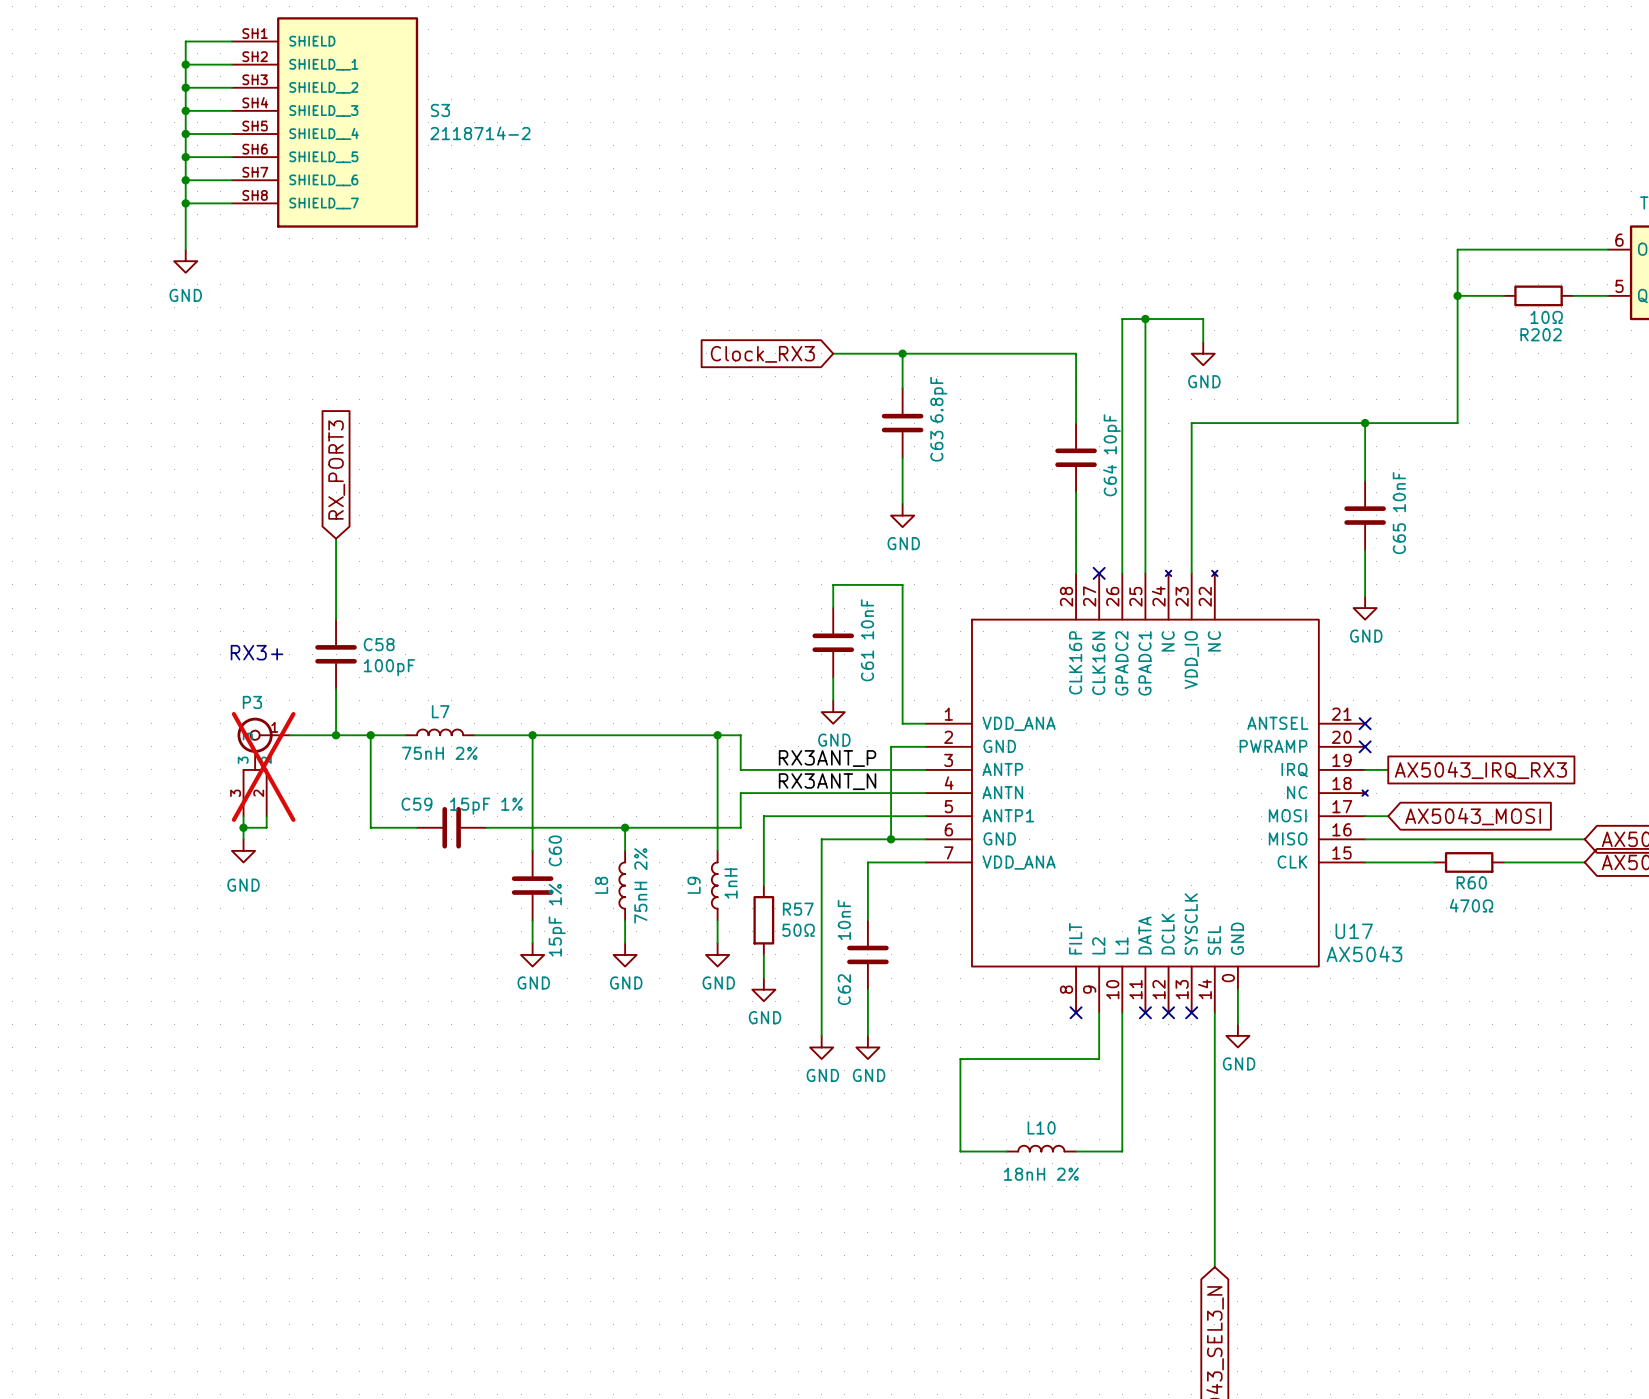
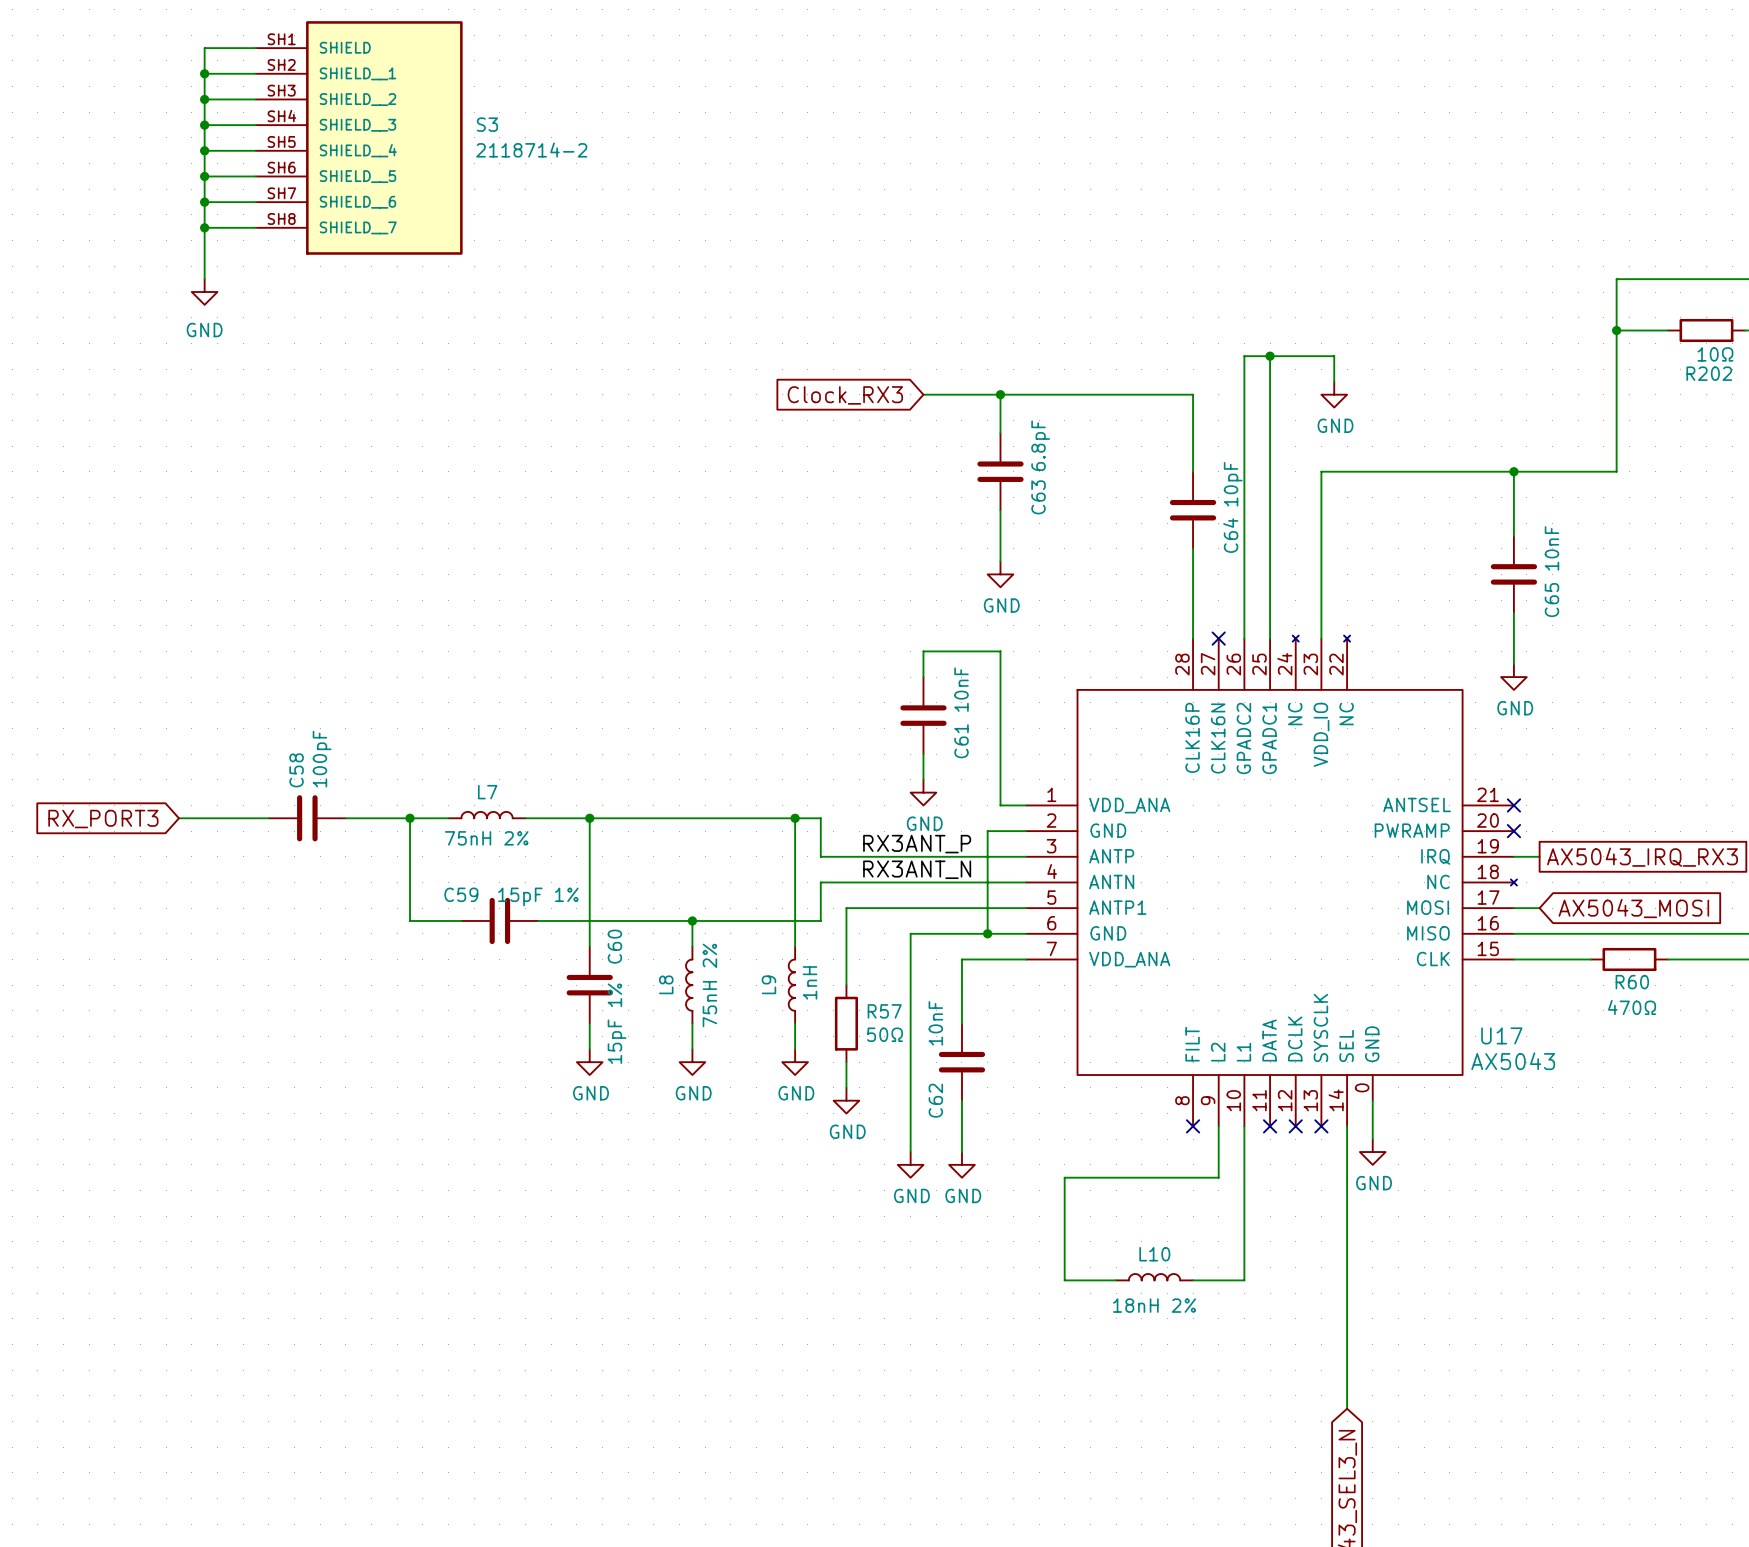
global label: RX_PORT3 (336, 469) -> none
wire: (336, 538) (336, 619) -> none
C58 name position: C58 (379, 644) -> C58 (296, 770)
text: RX3+ (257, 652) -> none
C58 rotation: 0° (336, 654) -> 90° clockwise (307, 818)
C58 position: (336, 654) -> (307, 818)
C58 value position: 100pF (389, 667) -> 100pF (322, 759)
wire: (336, 689) (336, 735) -> none
global label: none -> RX_PORT3 (103, 819)
wire: none -> (178, 818) (268, 818)
junction: (336, 735) -> none
P3: (263, 766) -> none
wire: (243, 816) (243, 839) -> none
wire: (266, 816) (266, 827) (243, 827) -> none
junction: (243, 827) -> none
power symbol: GND (243, 850) -> none

